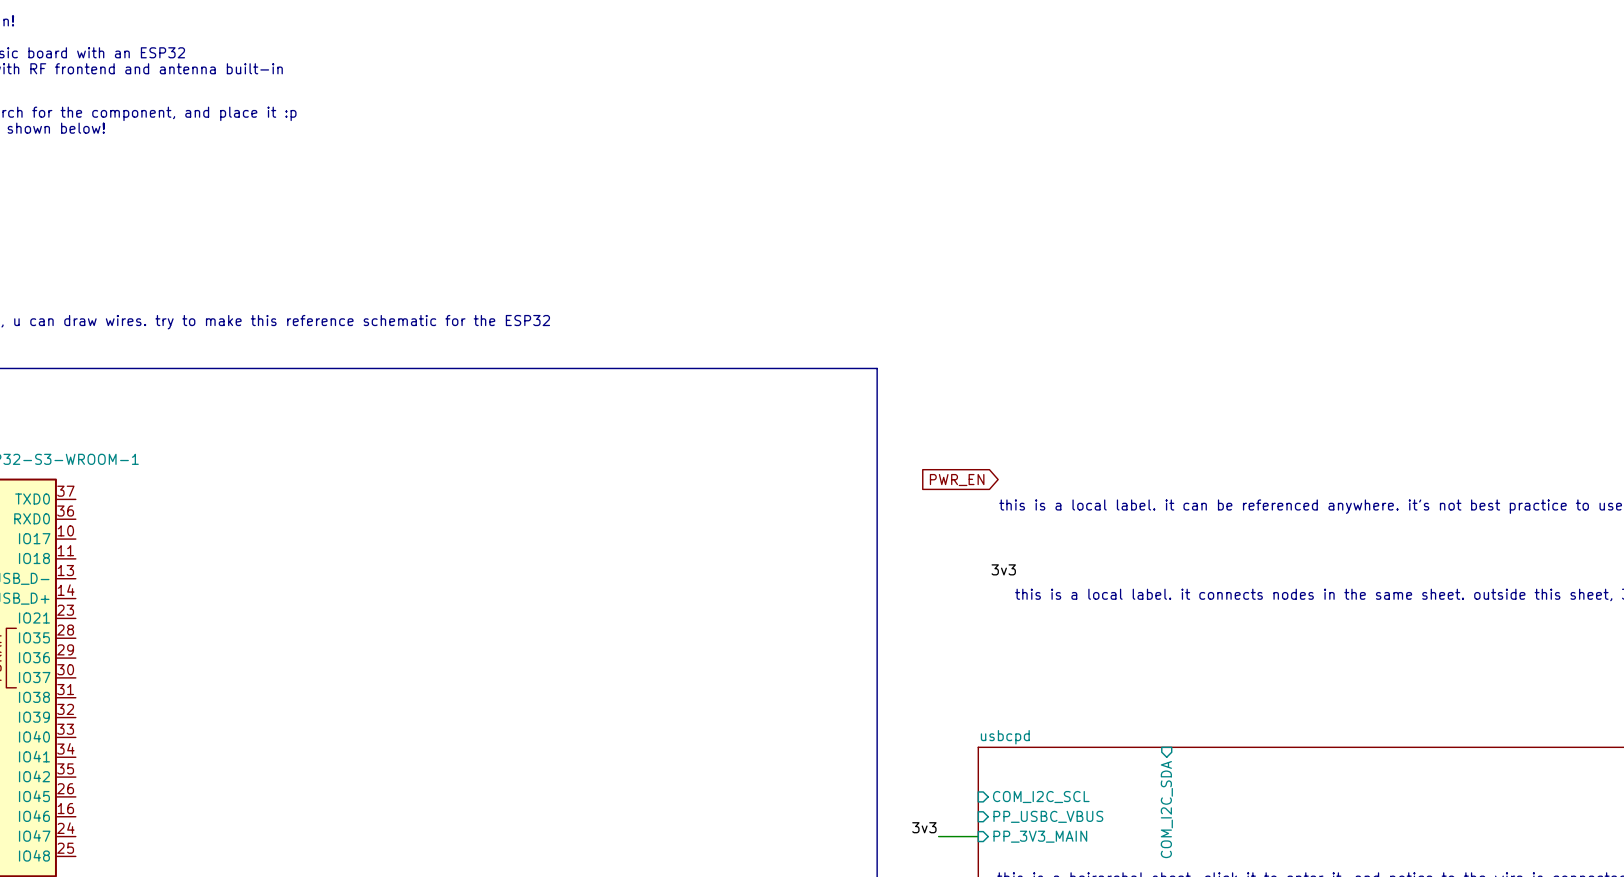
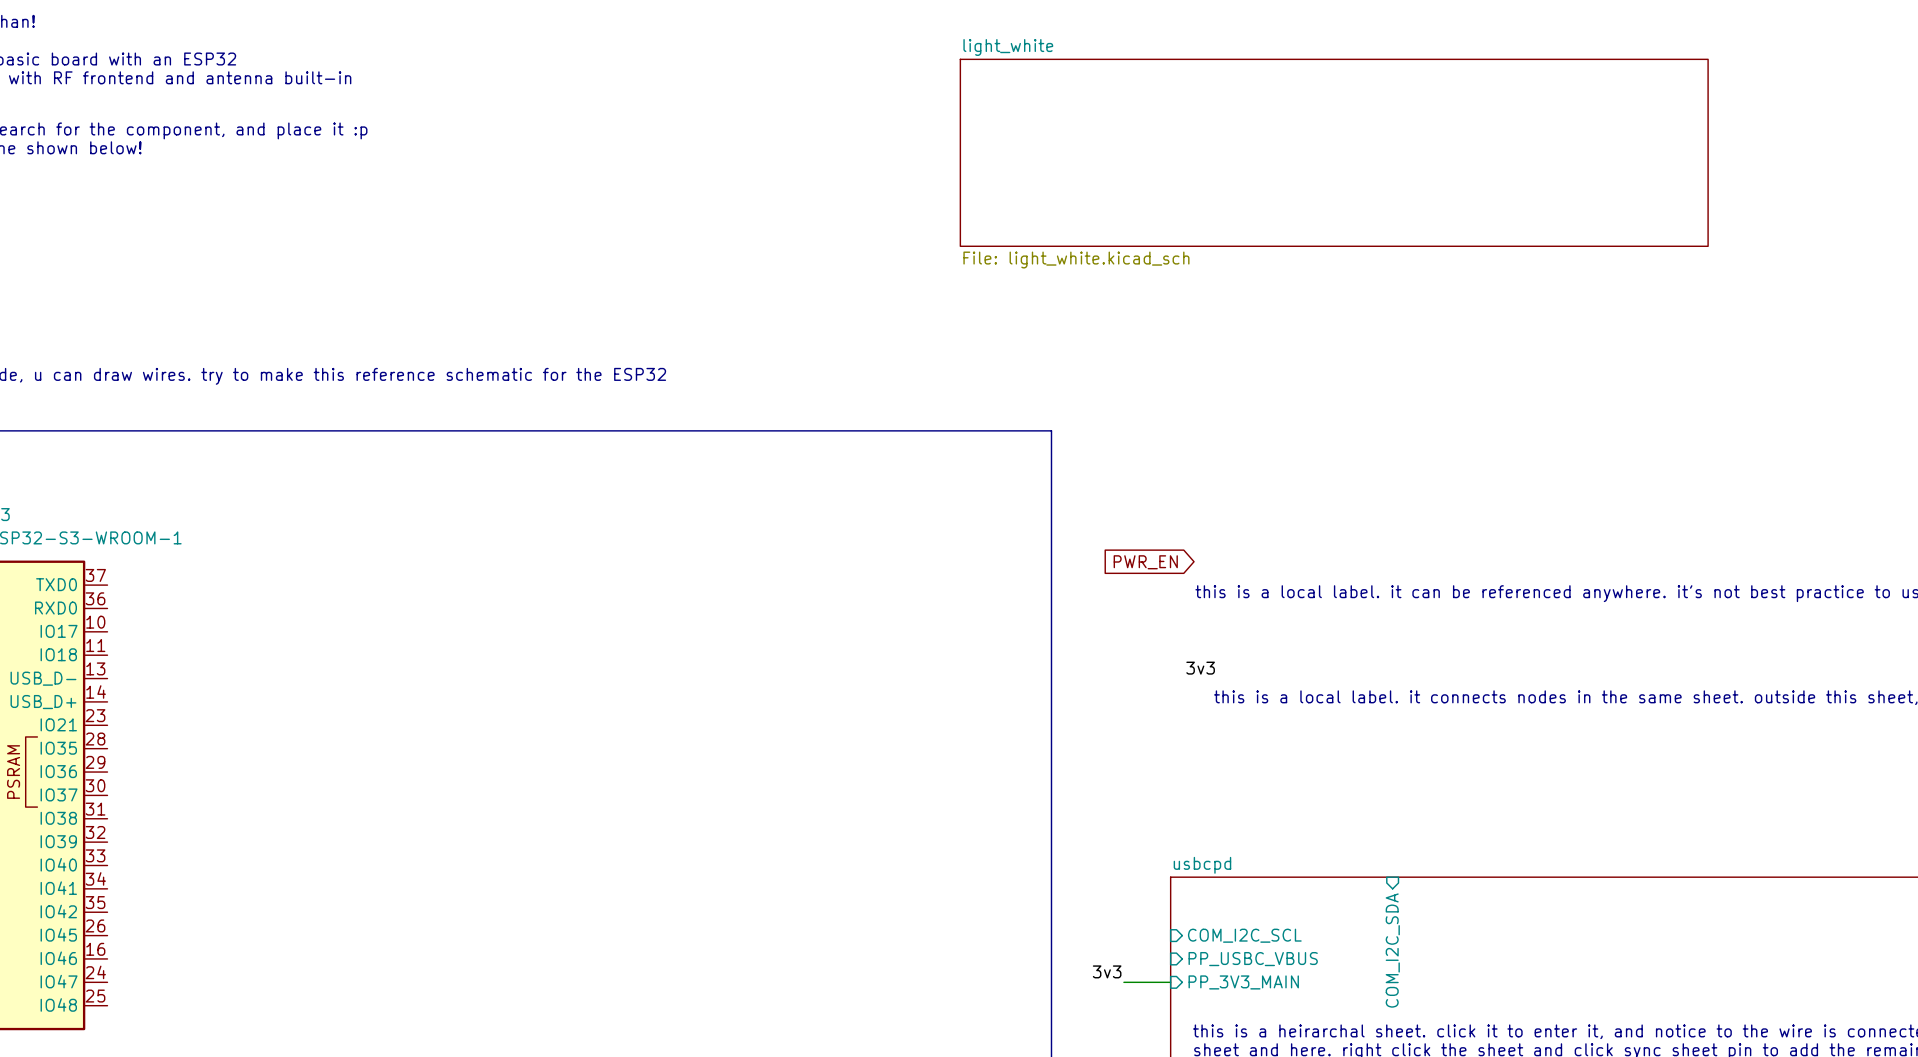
sheet light_white: none -> File: light_white.kicad_sch (1334, 152)

